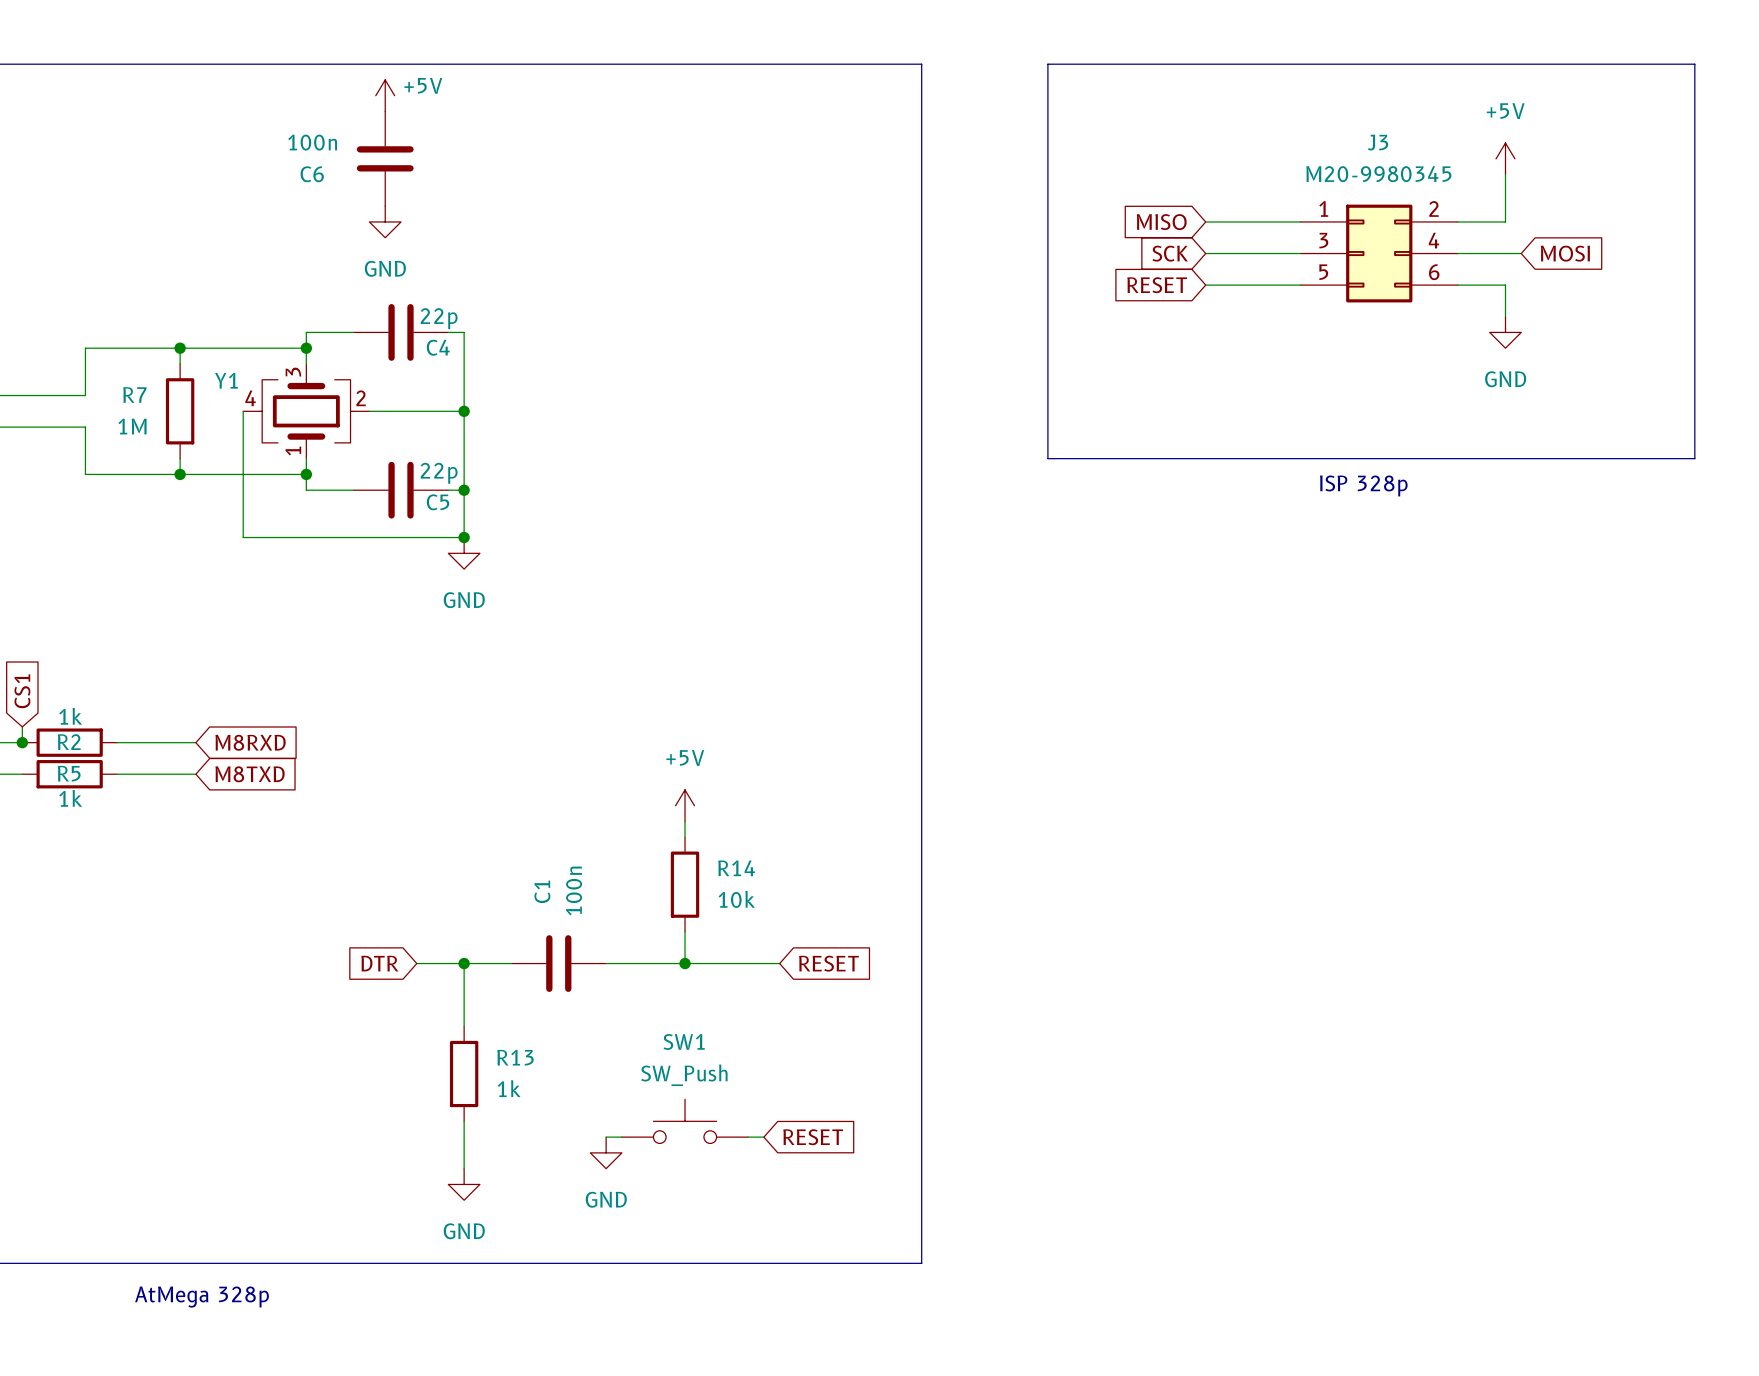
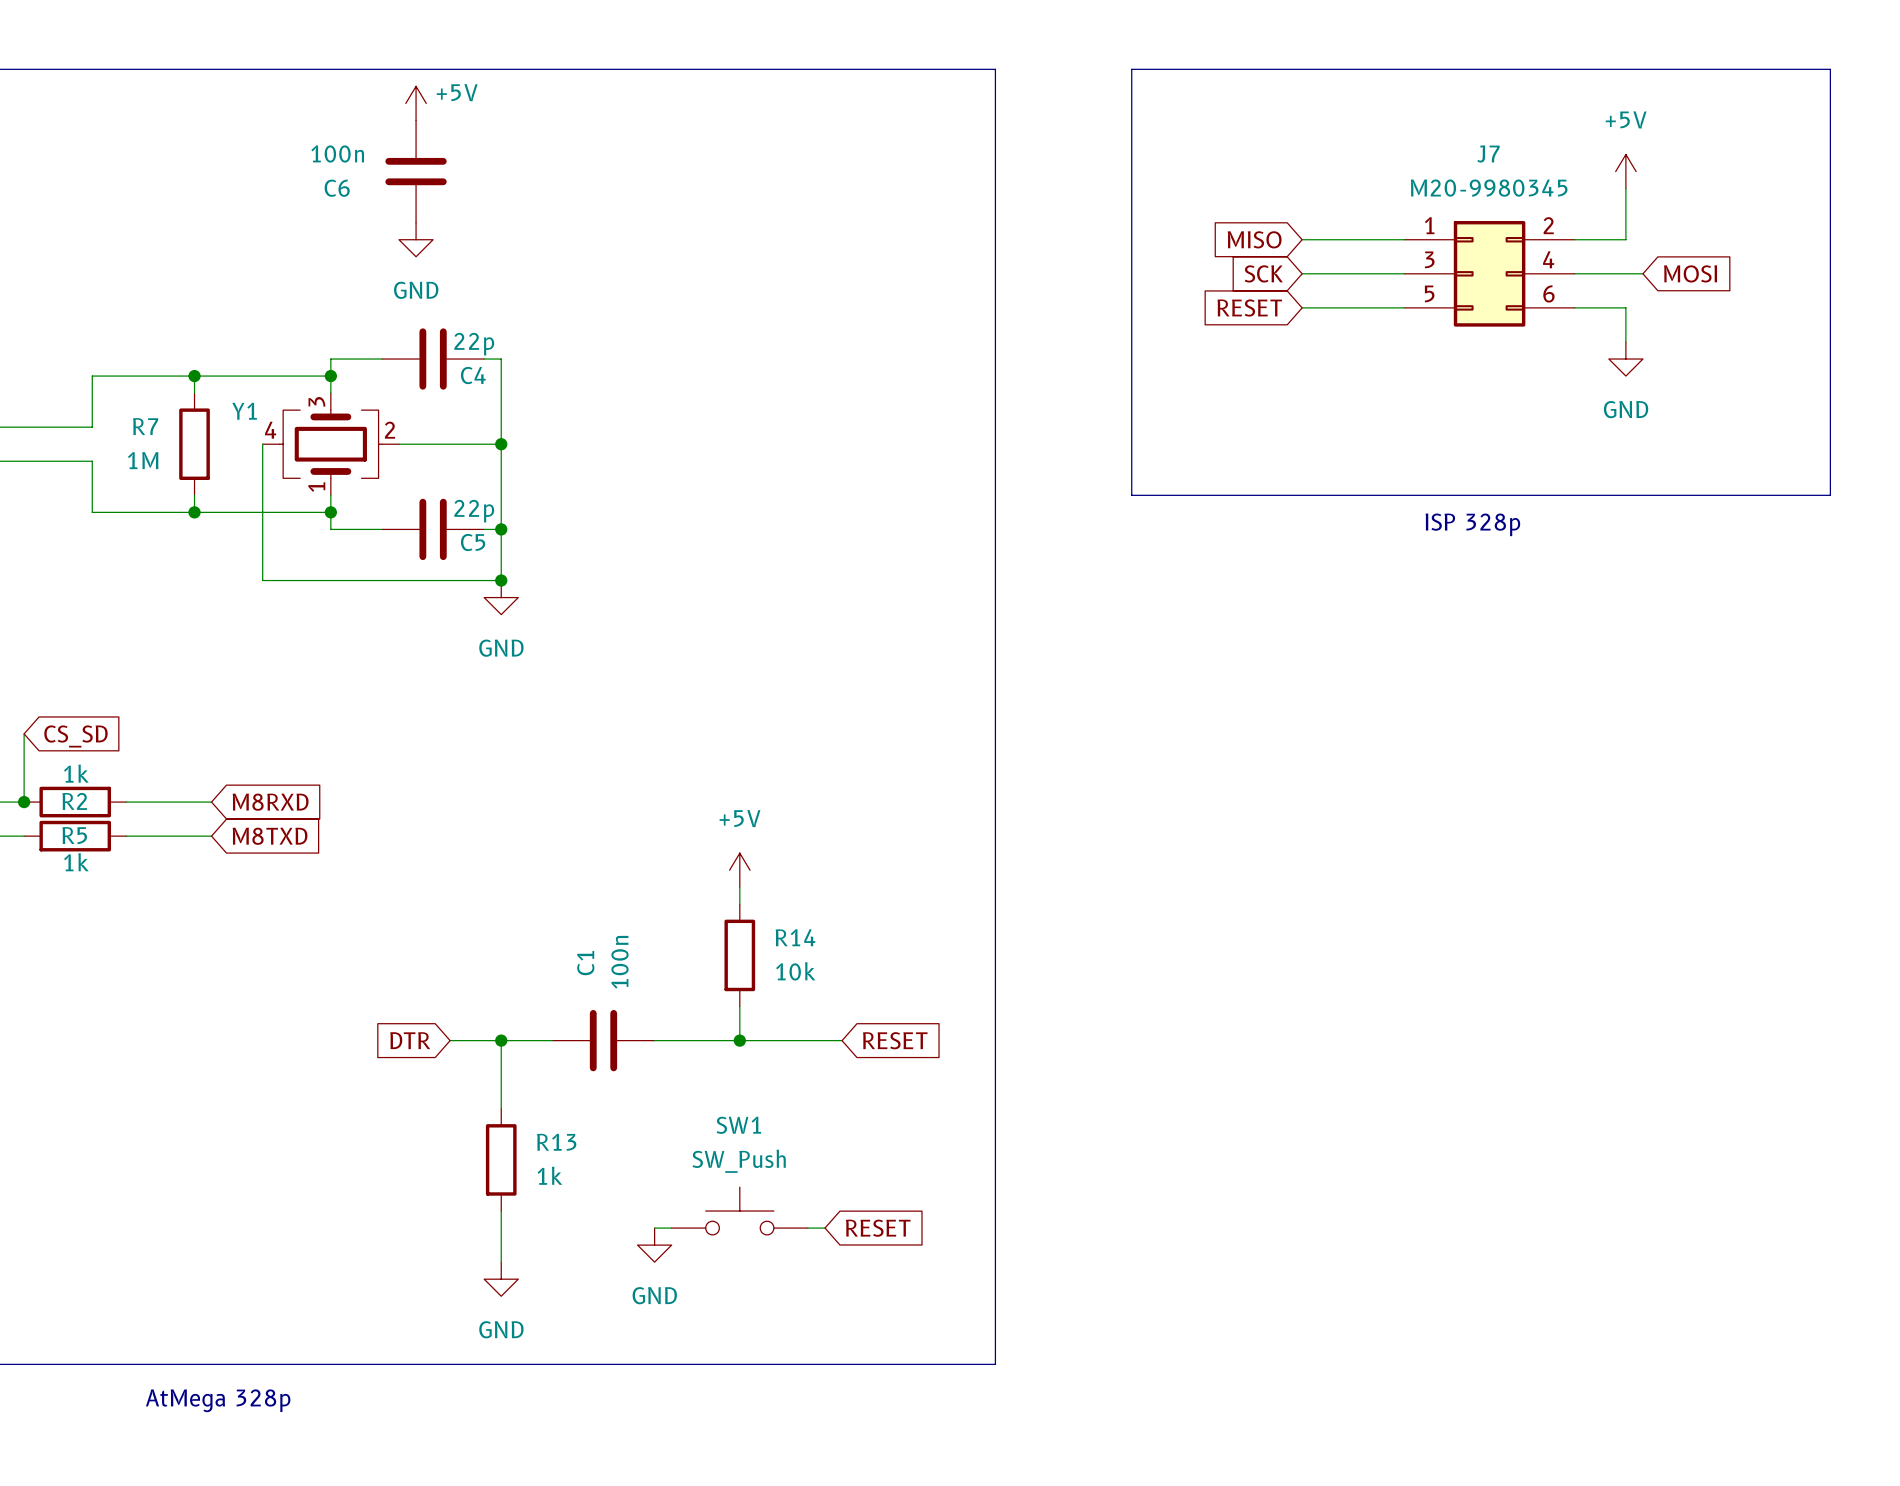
J3 name: J3 (1378, 142) -> J7 (1488, 153)
wire: none -> (24, 733) (24, 785)
global label: none -> CS_SD (75, 736)
global label: CS1 (22, 691) -> none

